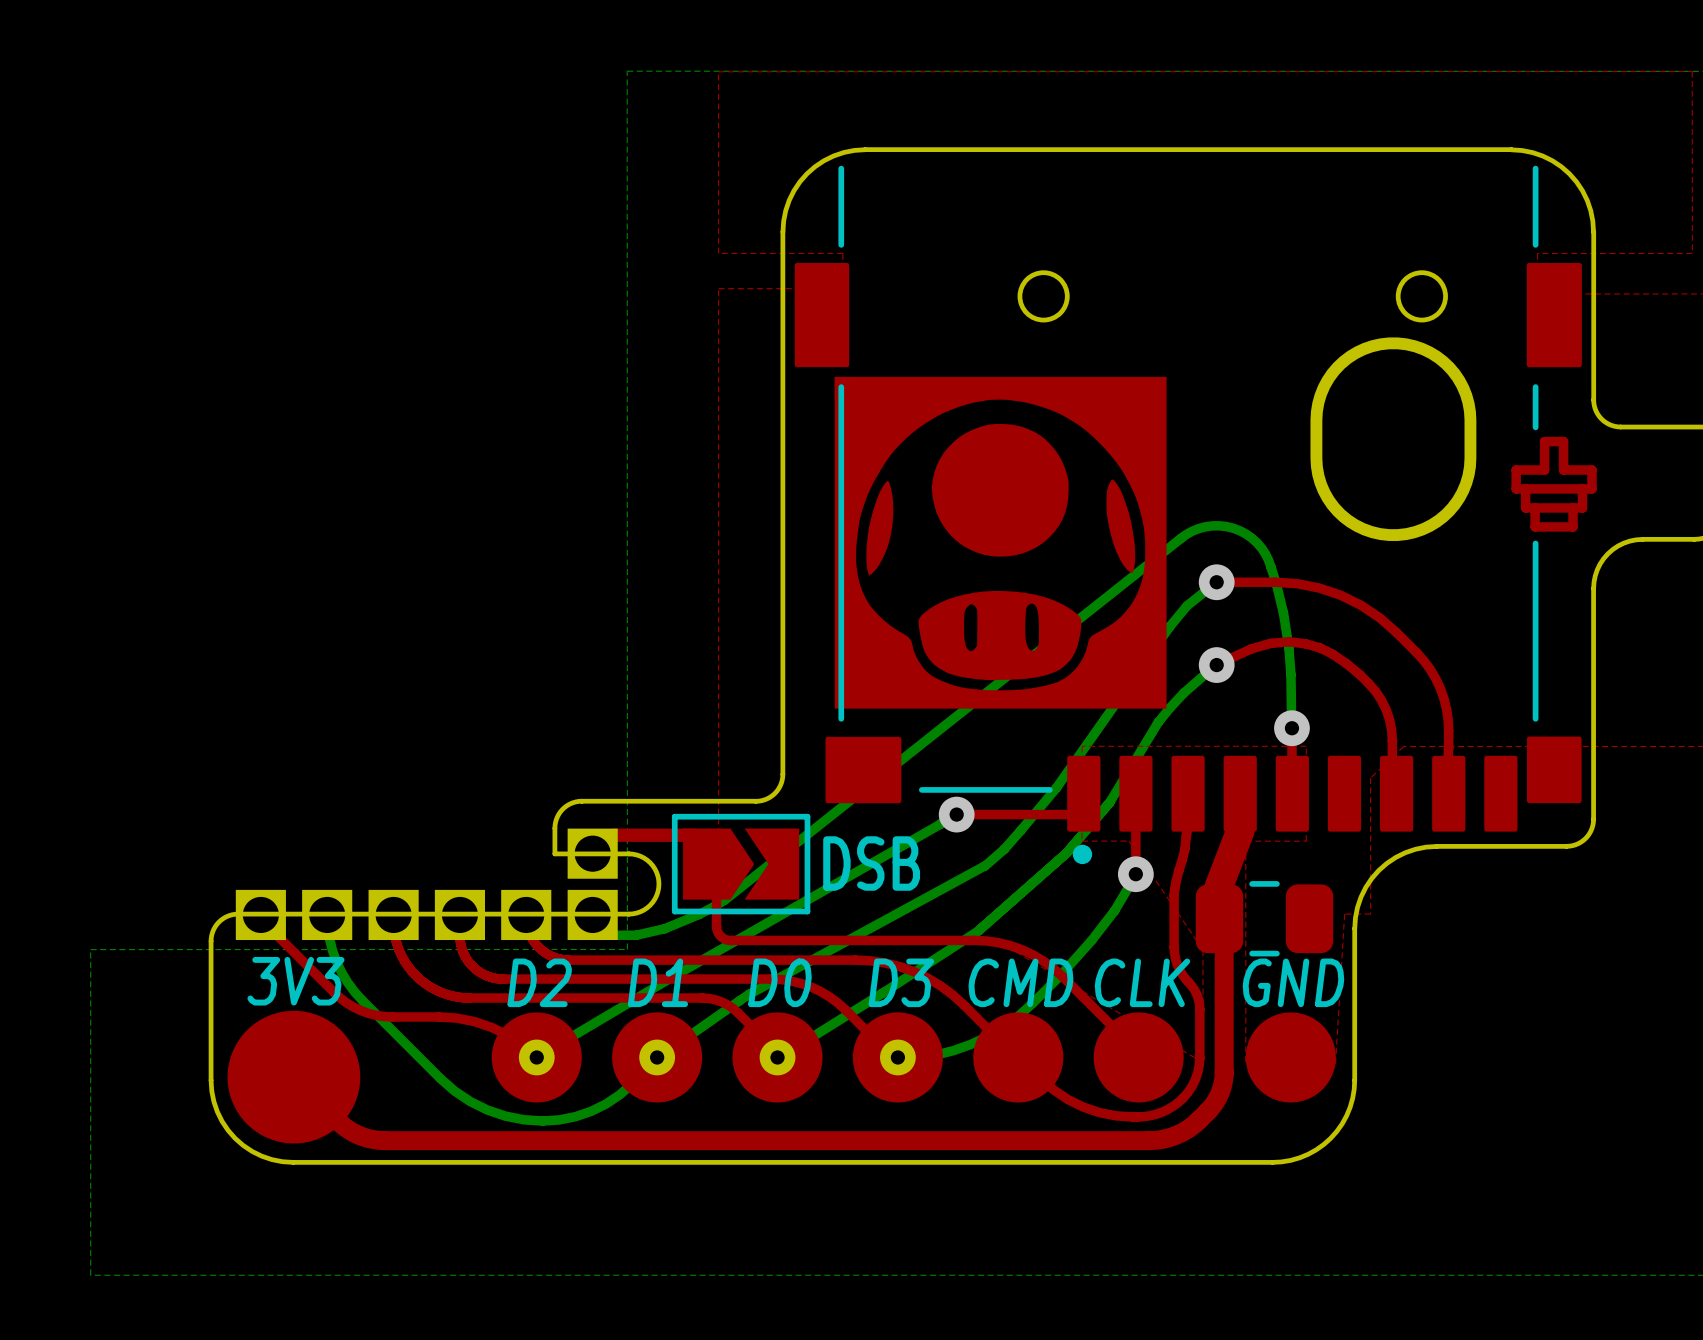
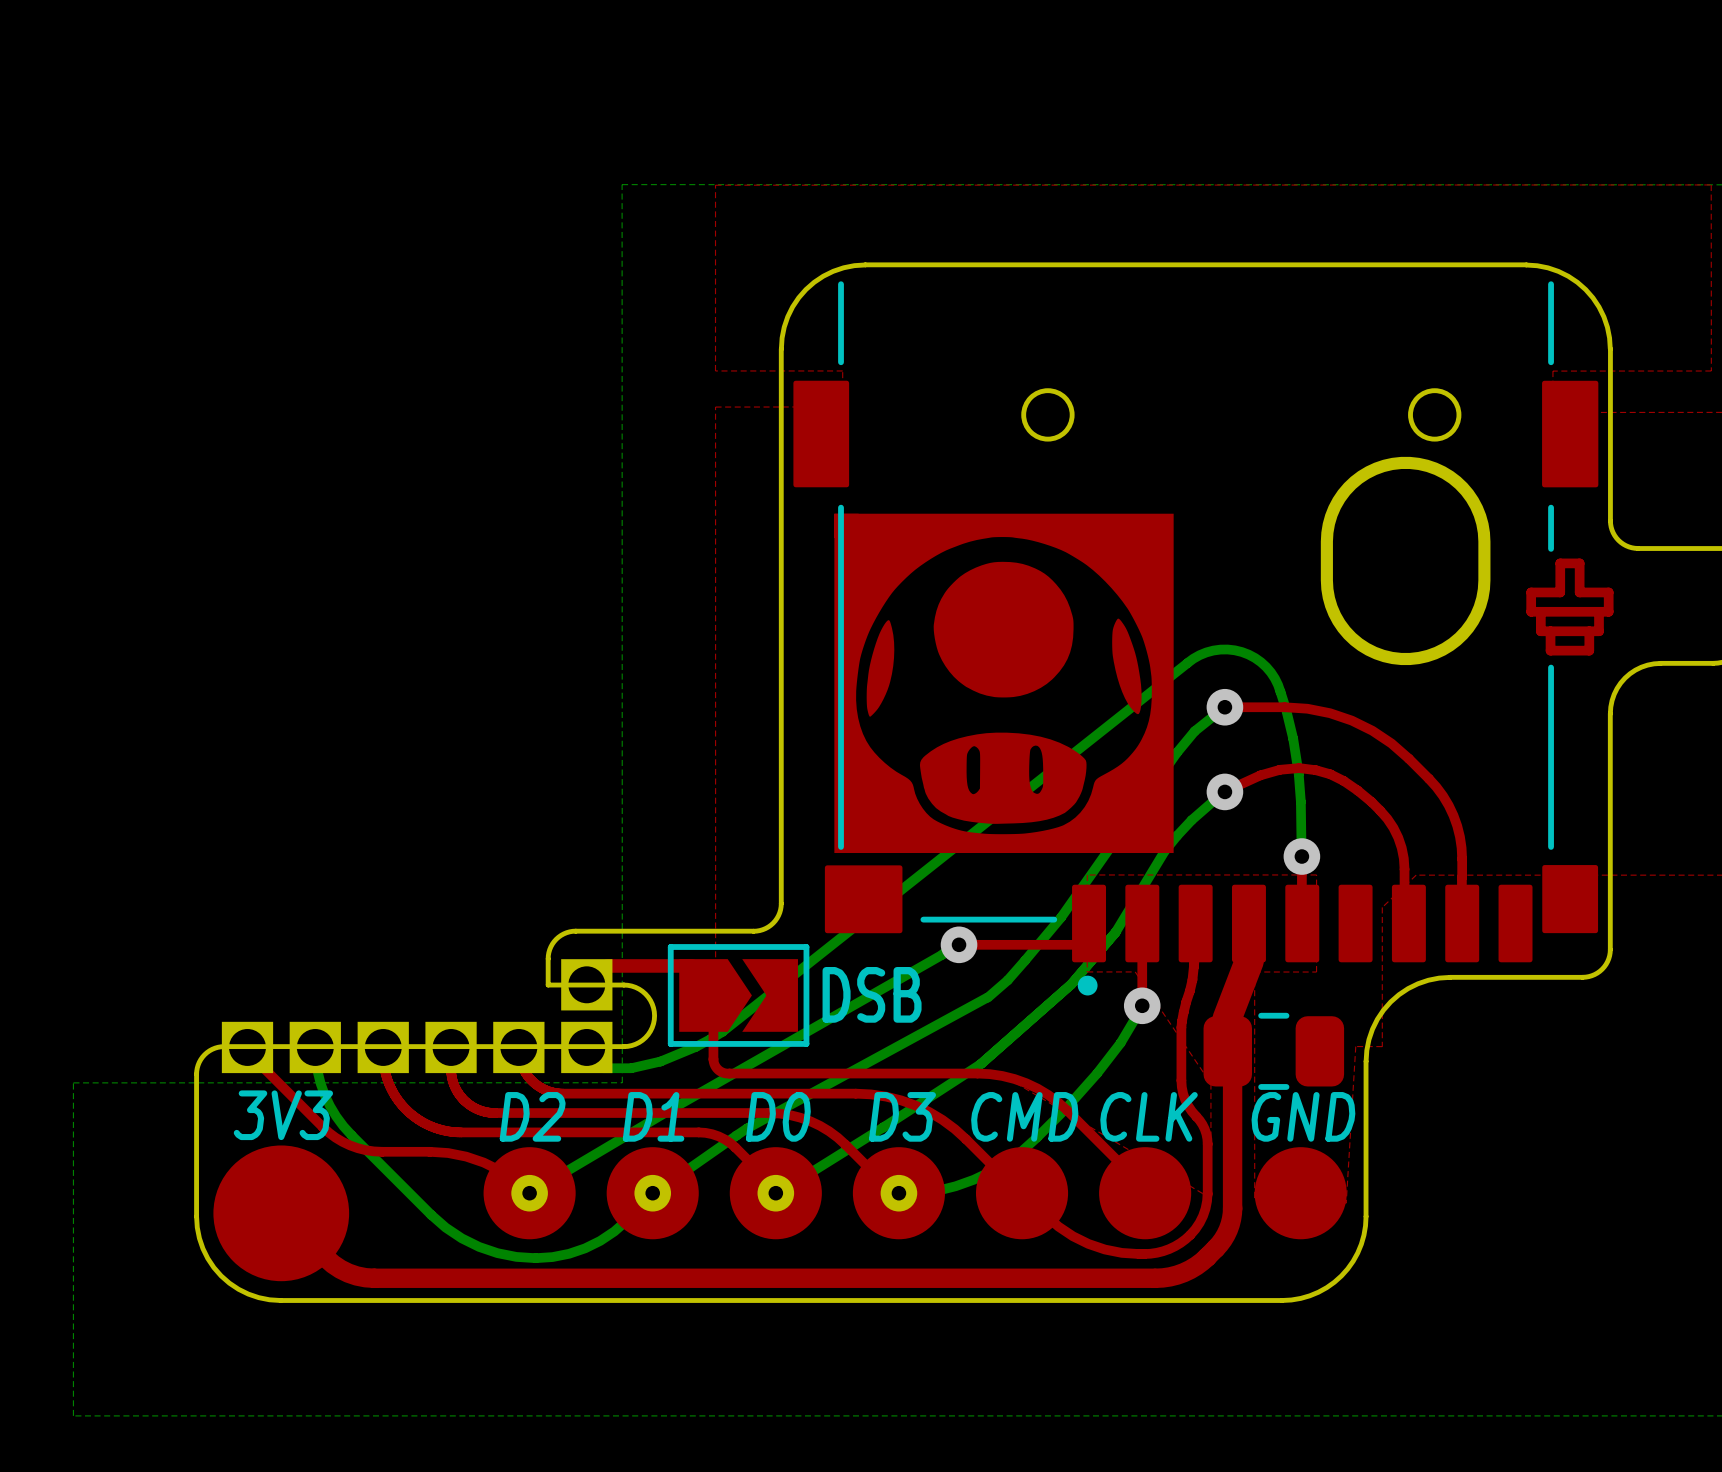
part position: (1000, 542) -> (1004, 683)

